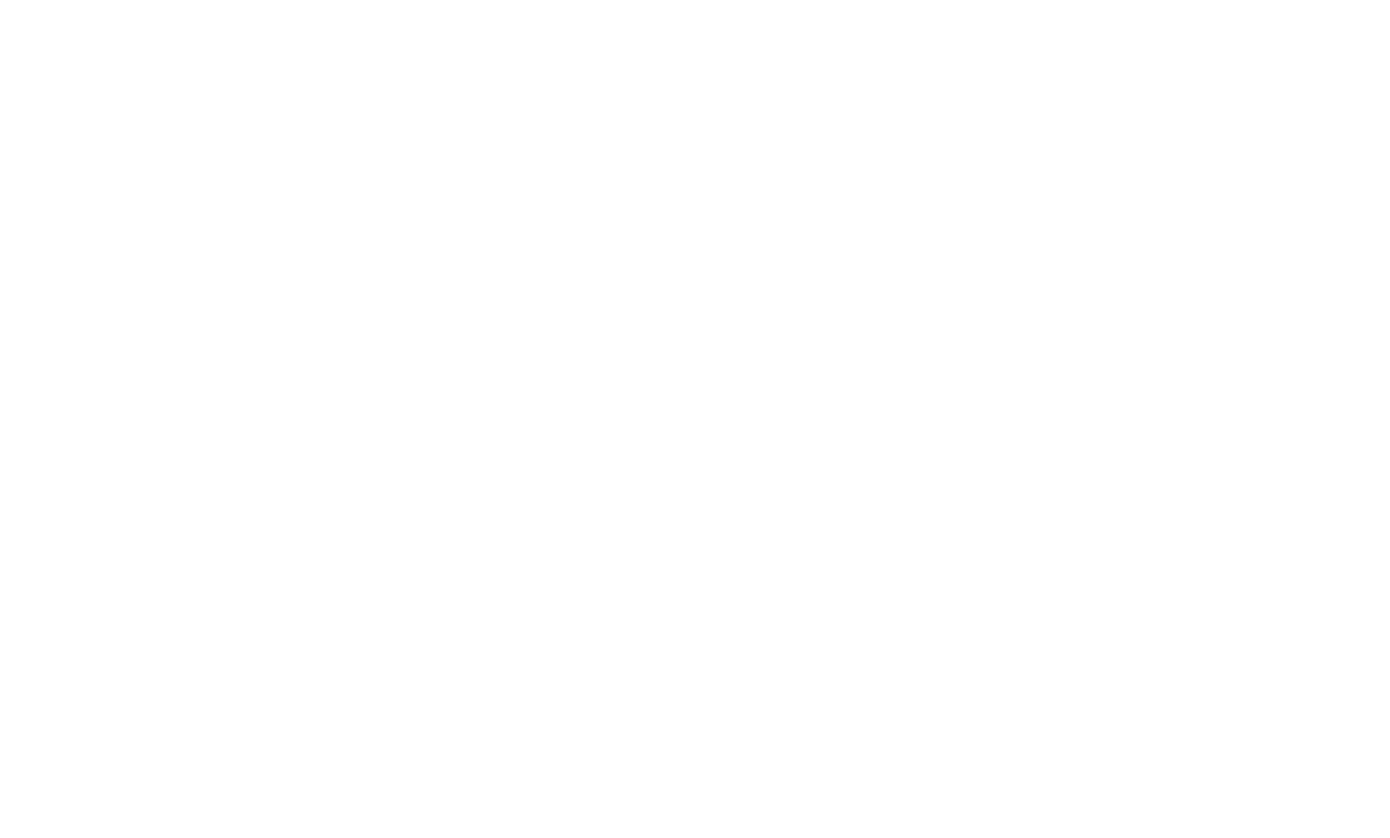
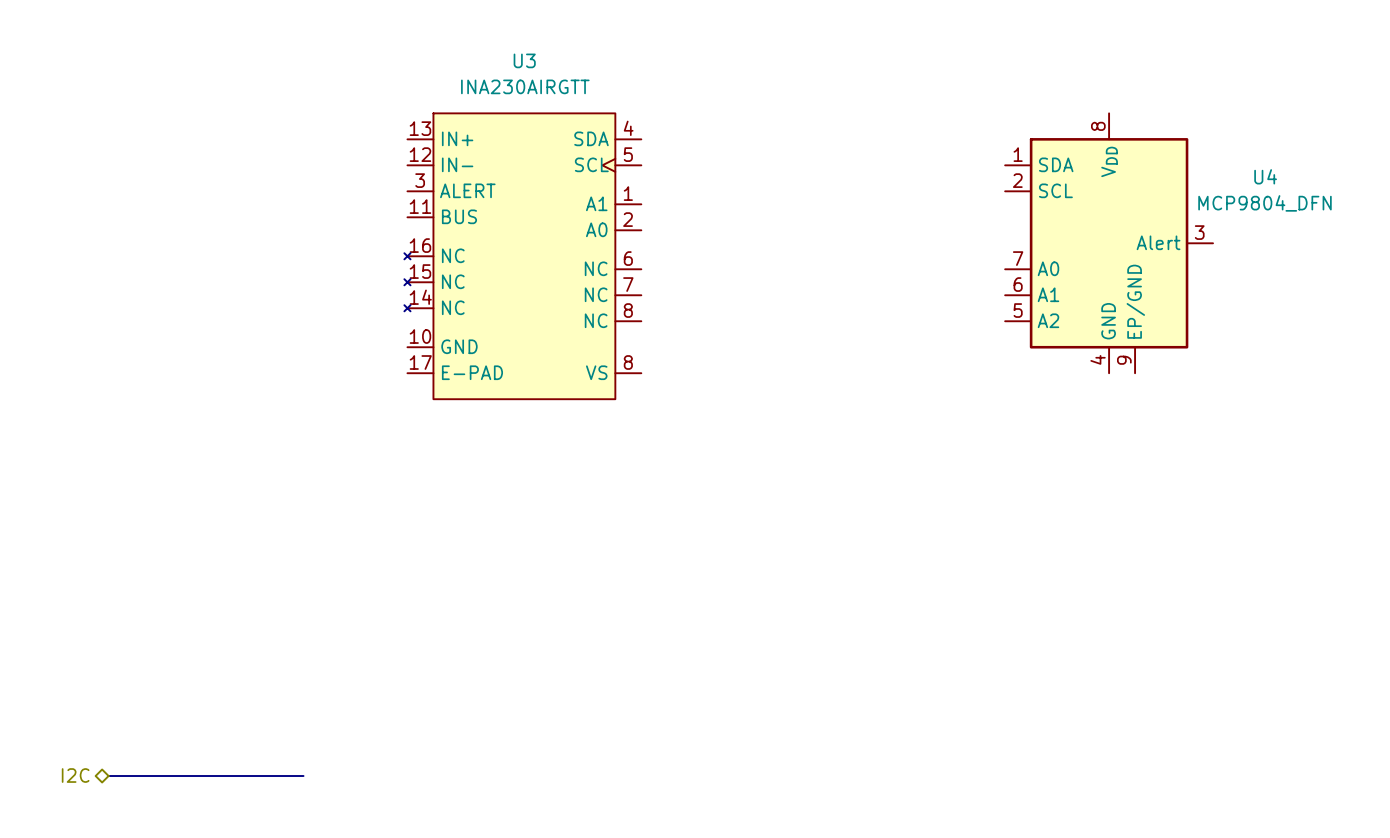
U4: none -> MCP9804_DFN (1109, 243)
U3: none -> INA230AIRGTT (522, 256)
hierarchical label: none -> I2C (75, 775)
bus: none -> (108, 776) (303, 776)

